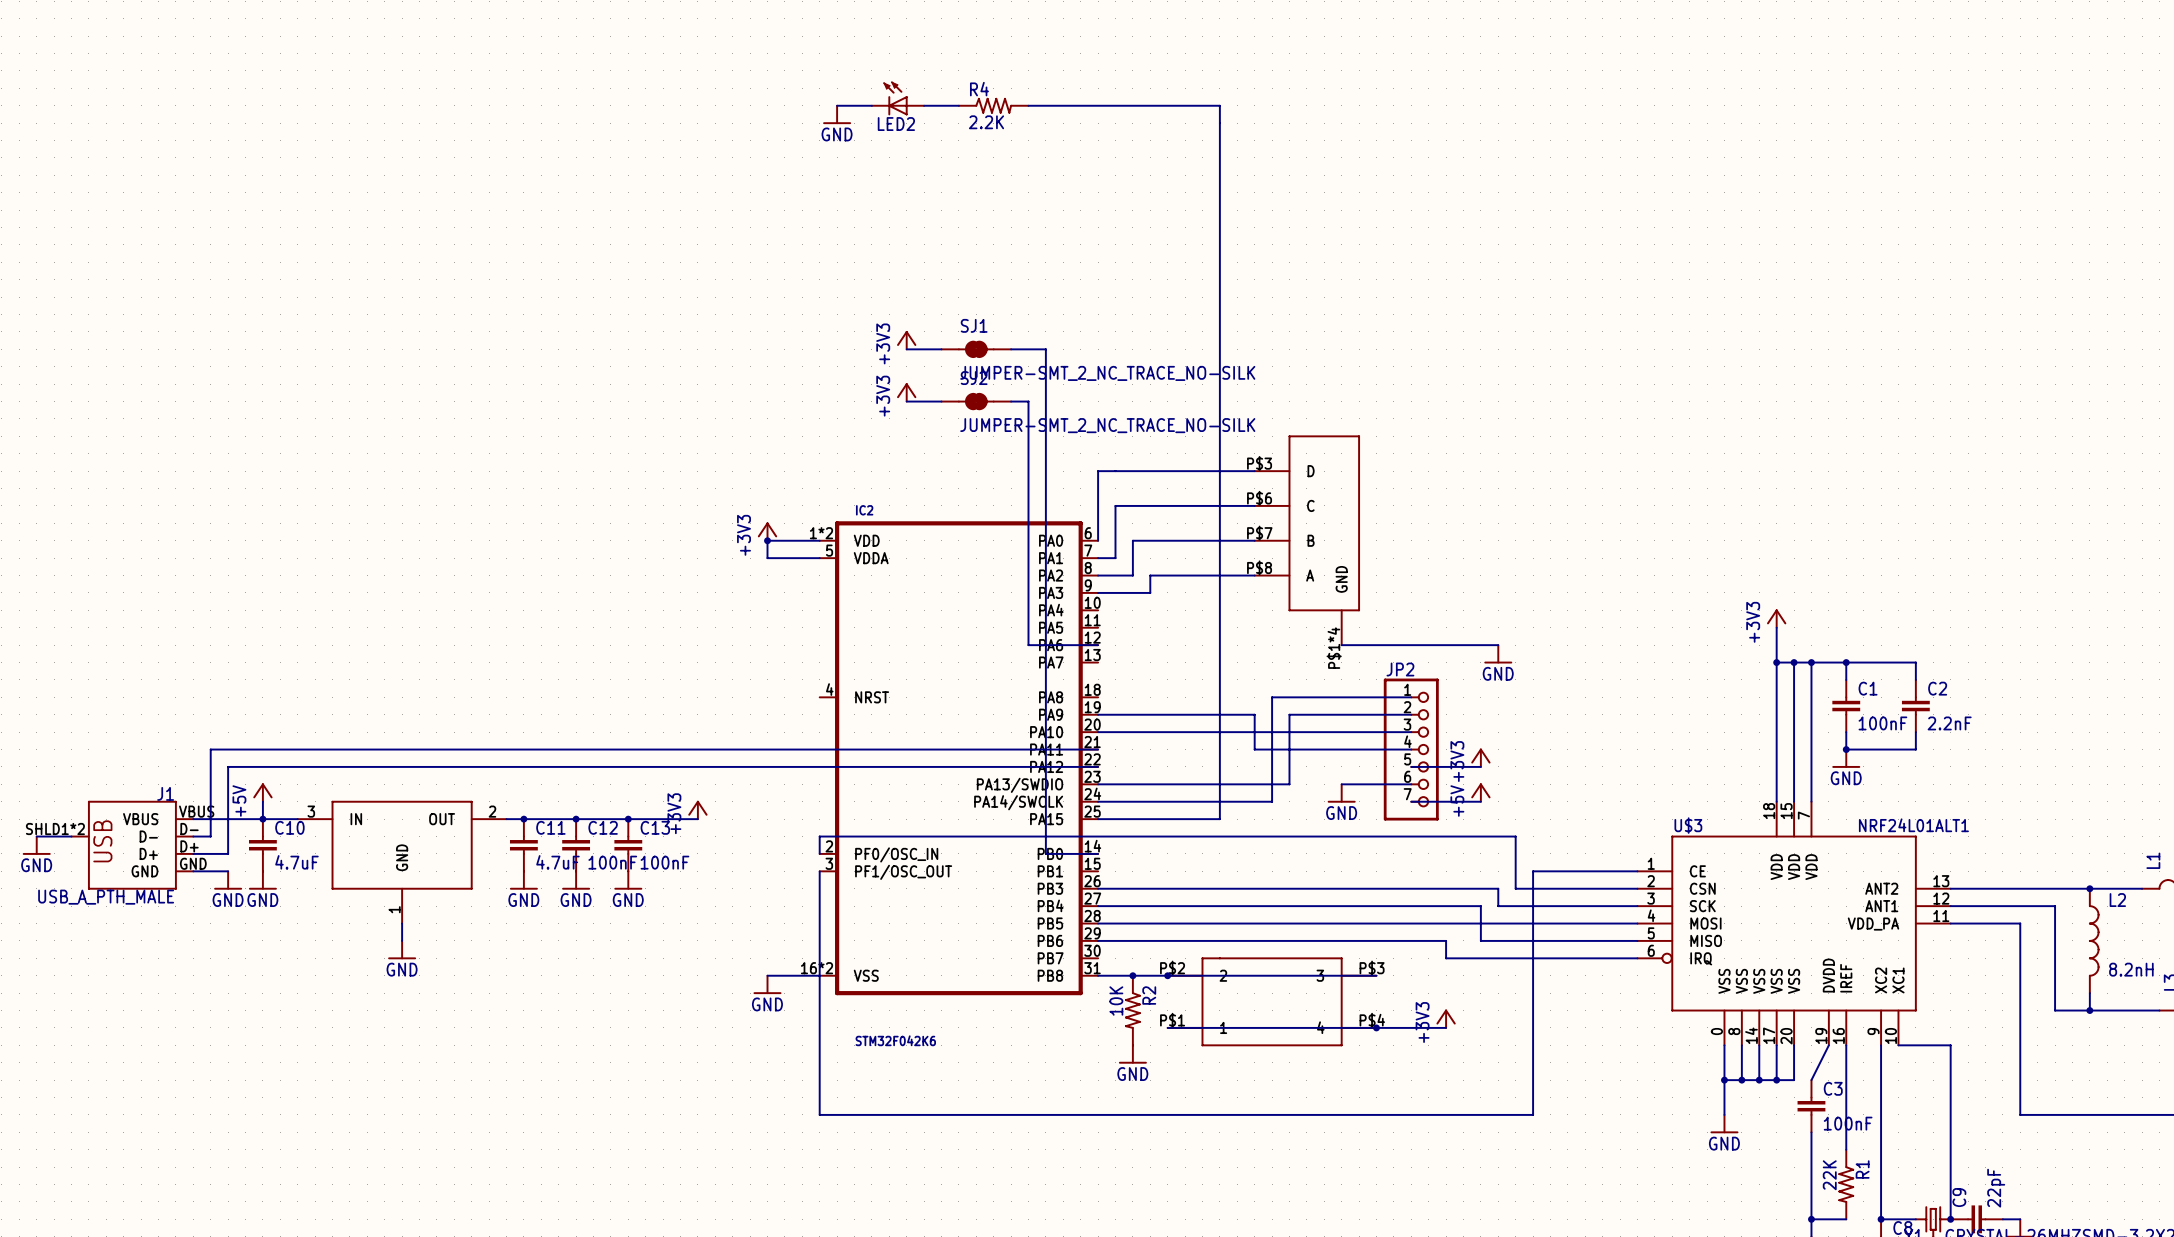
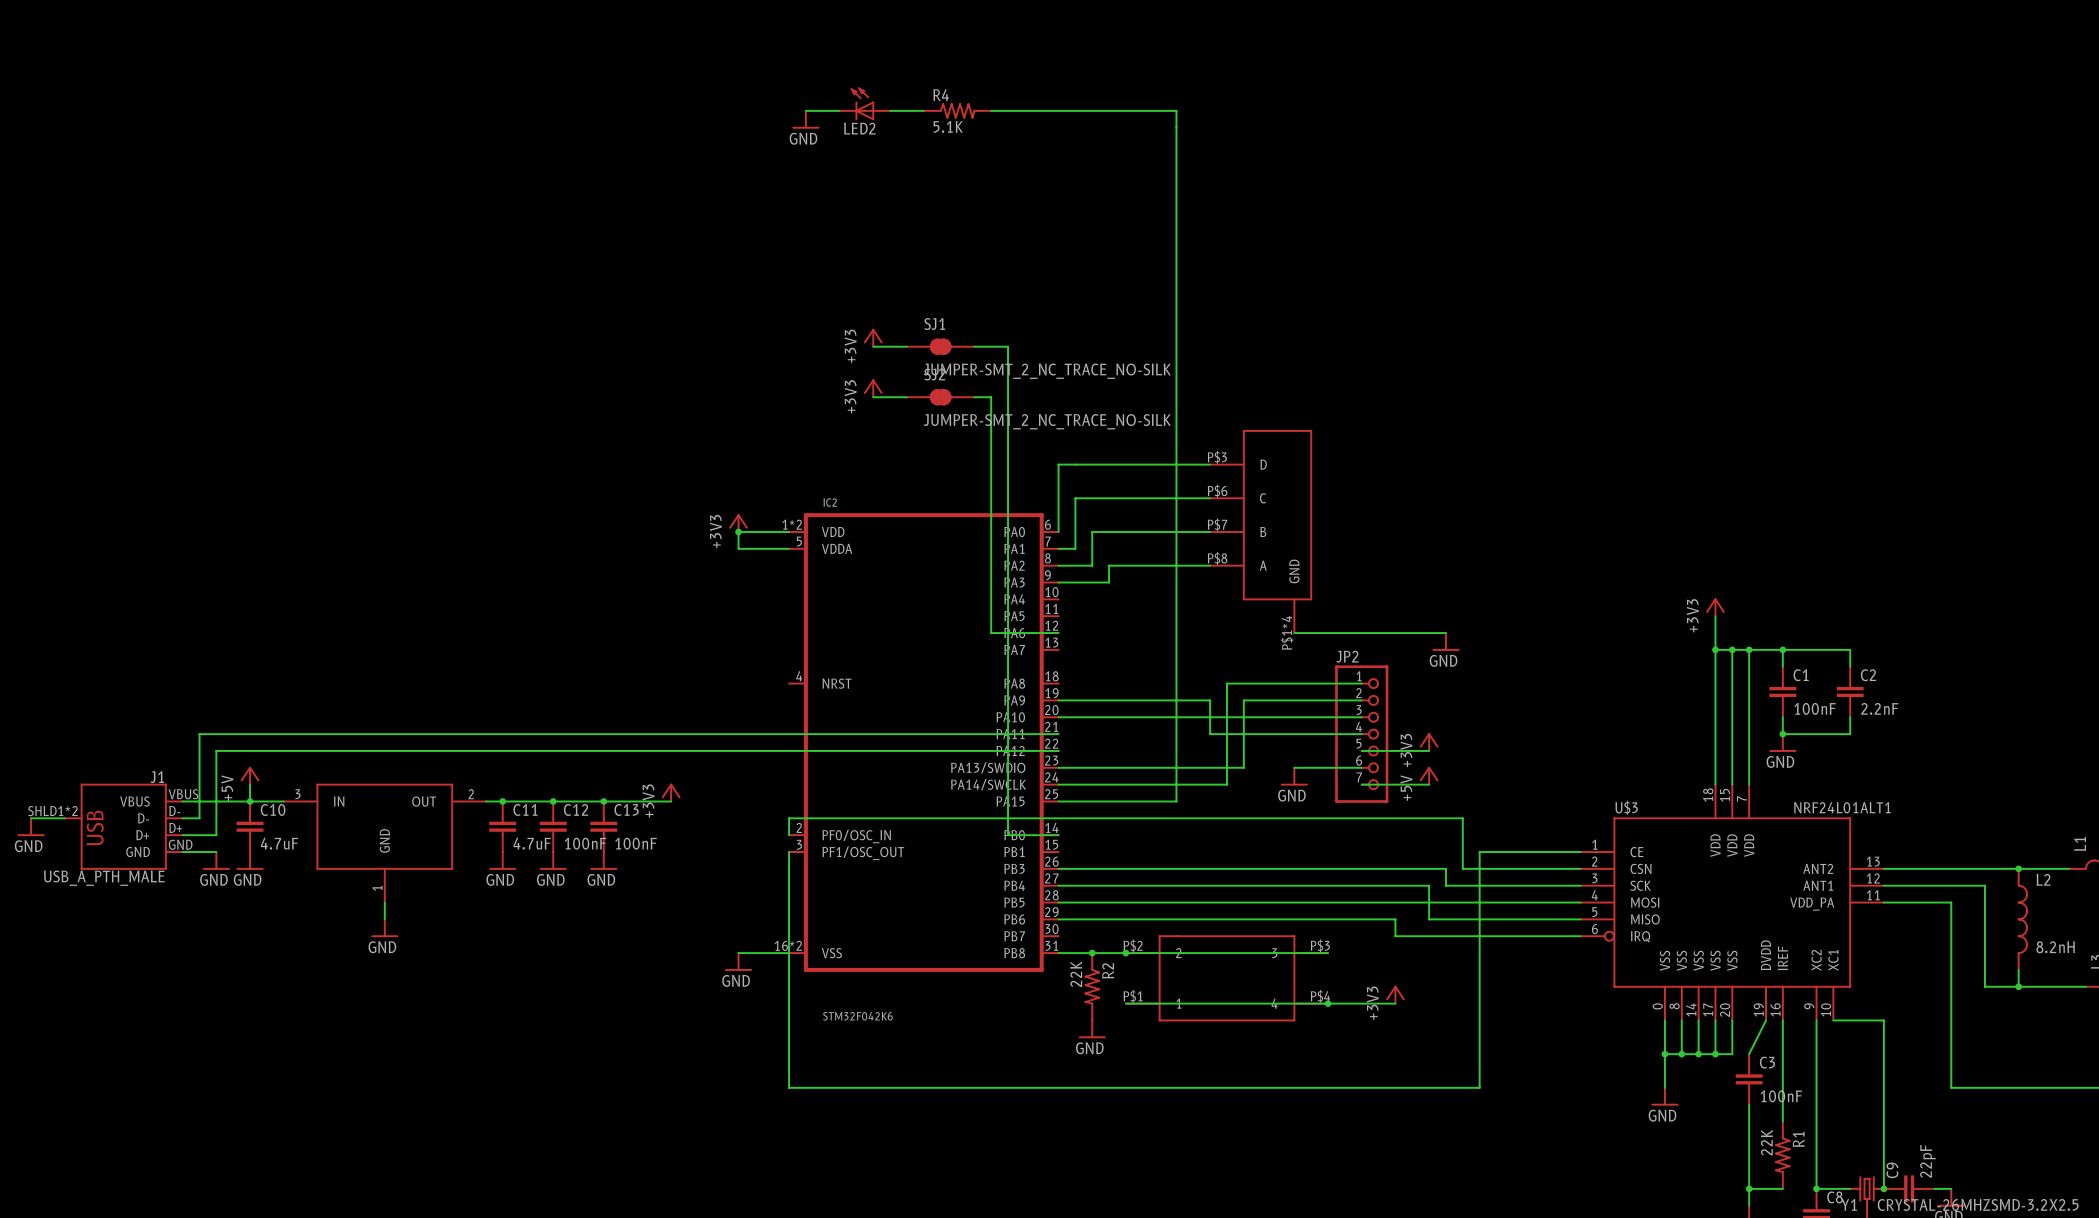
R4 value: 2.2K (986, 122) -> 5.1K (948, 126)
R2 value: 10K (1116, 1000) -> 22K (1076, 974)

